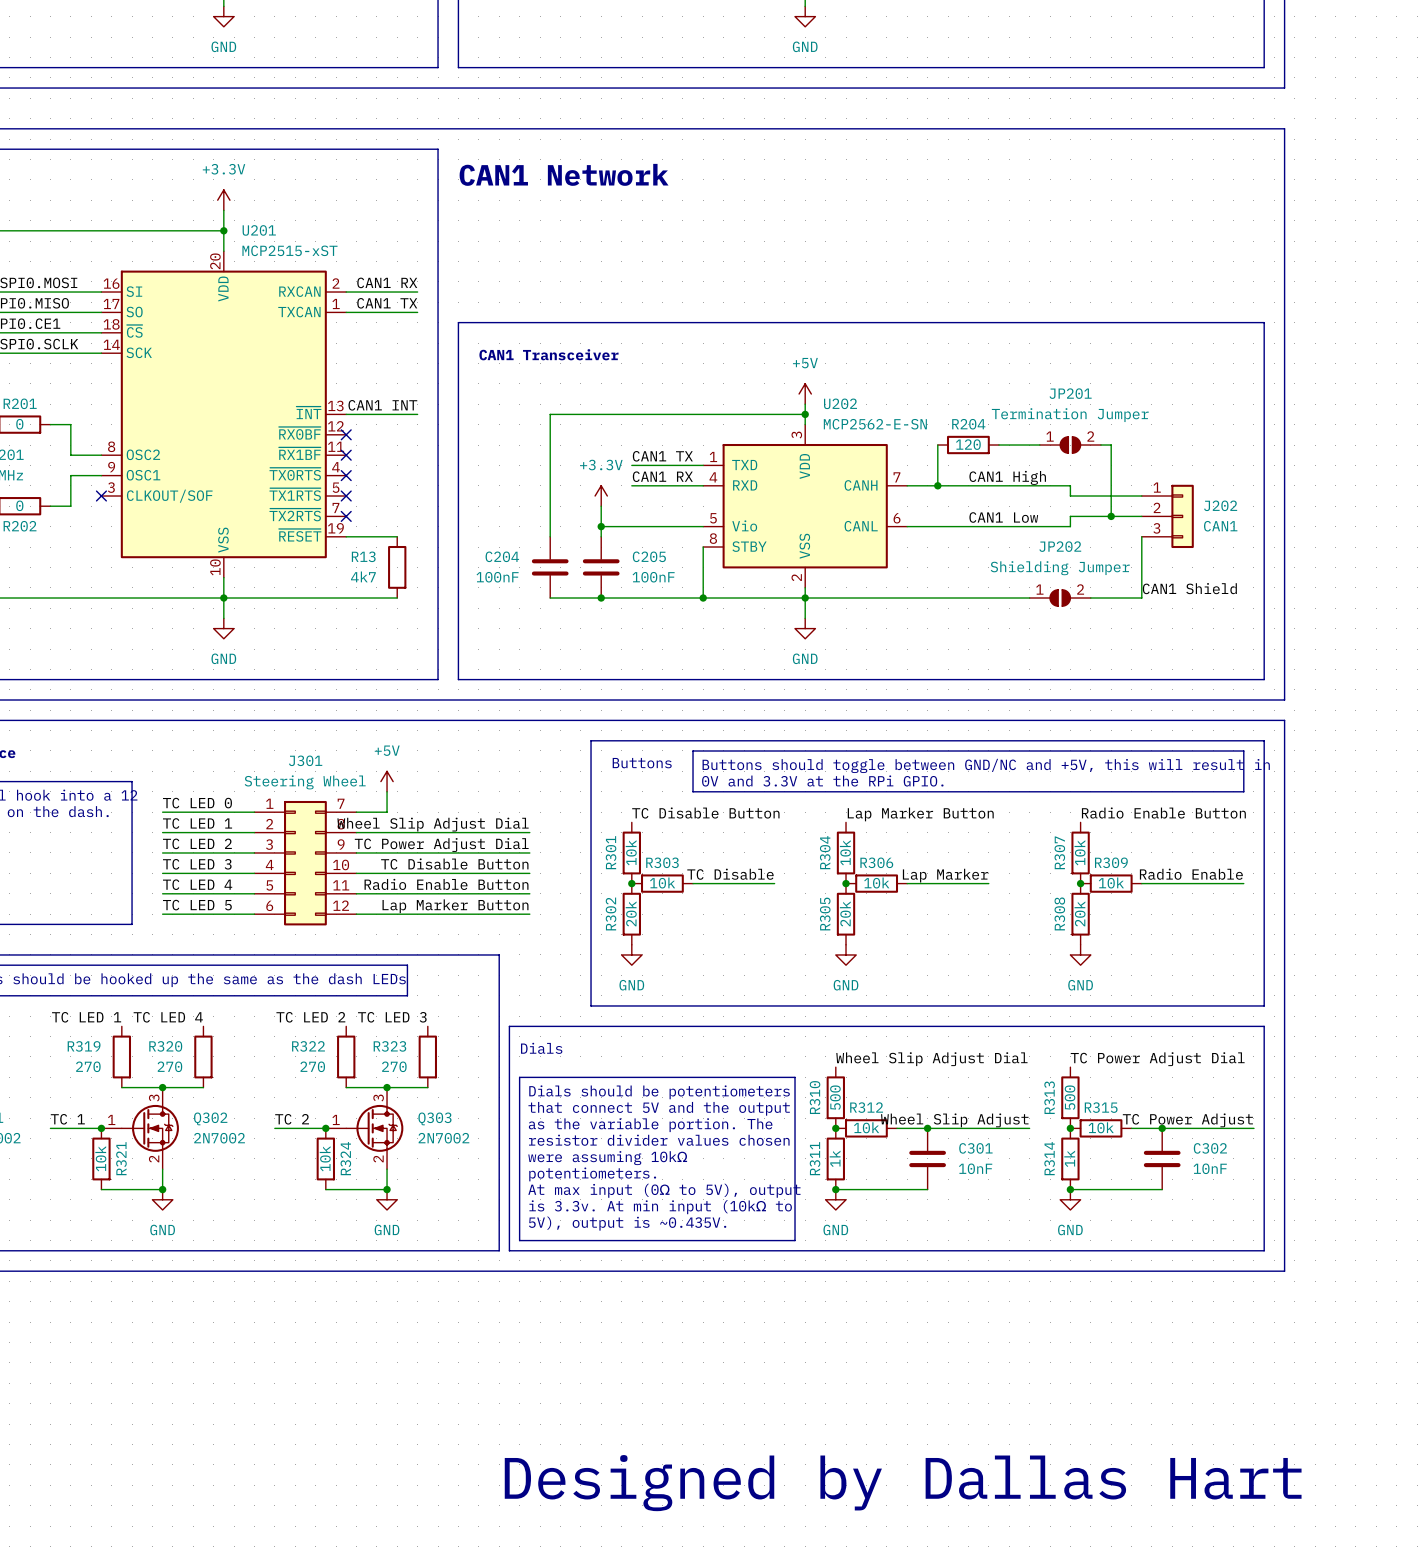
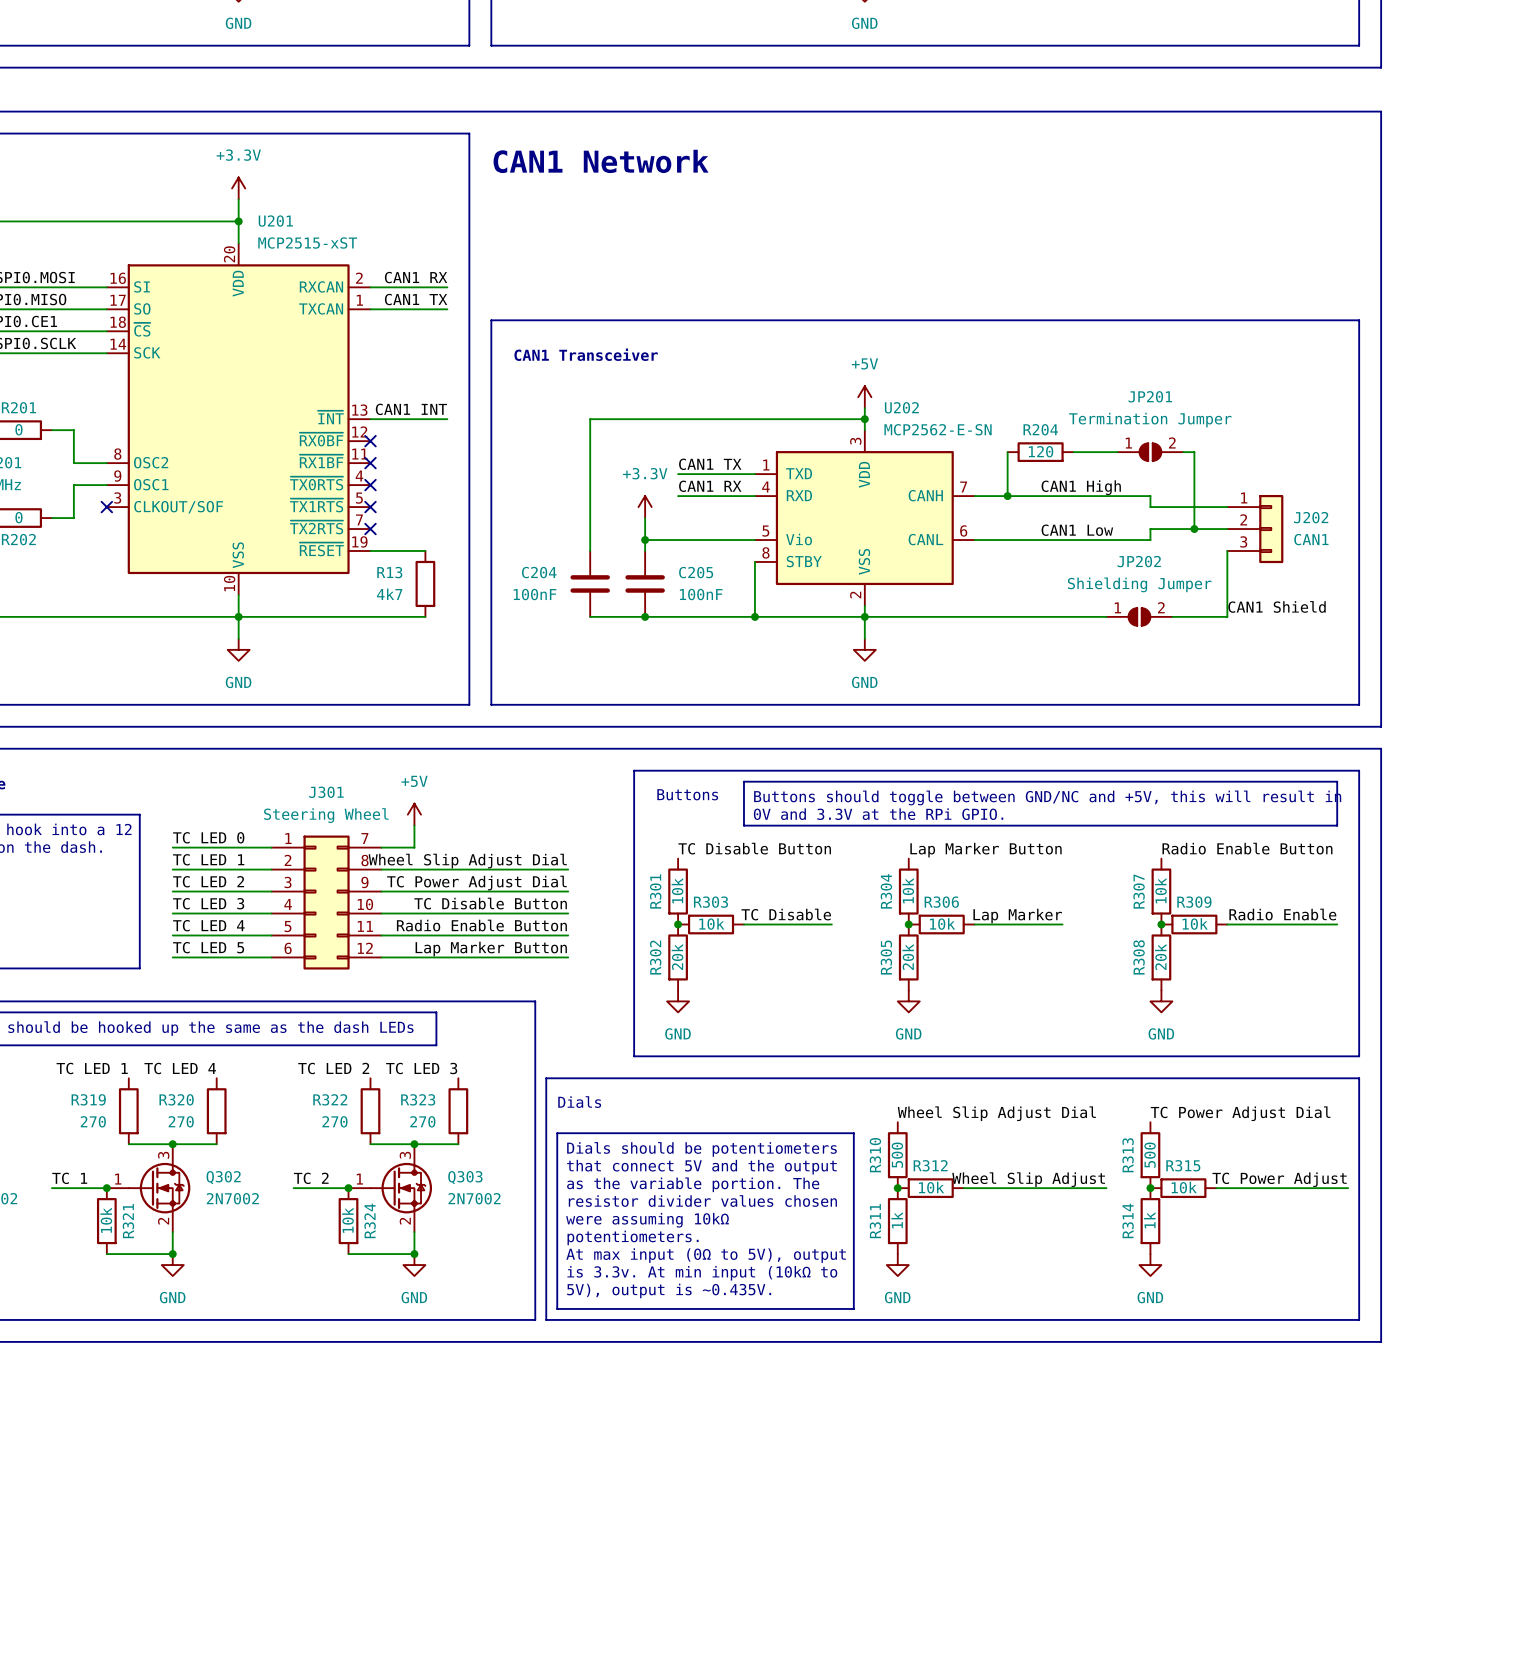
junction: (927, 1128) -> none
junction: (1162, 1128) -> none
C301: 10nF (927, 1158) -> none
C302: 10nF (1162, 1158) -> none
wire: (835, 1189) (927, 1189) -> none
junction: (835, 1189) -> none
wire: (1070, 1189) (1162, 1189) -> none
junction: (1070, 1189) -> none
text: Designed by Dallas Hart (903, 1483) -> none

